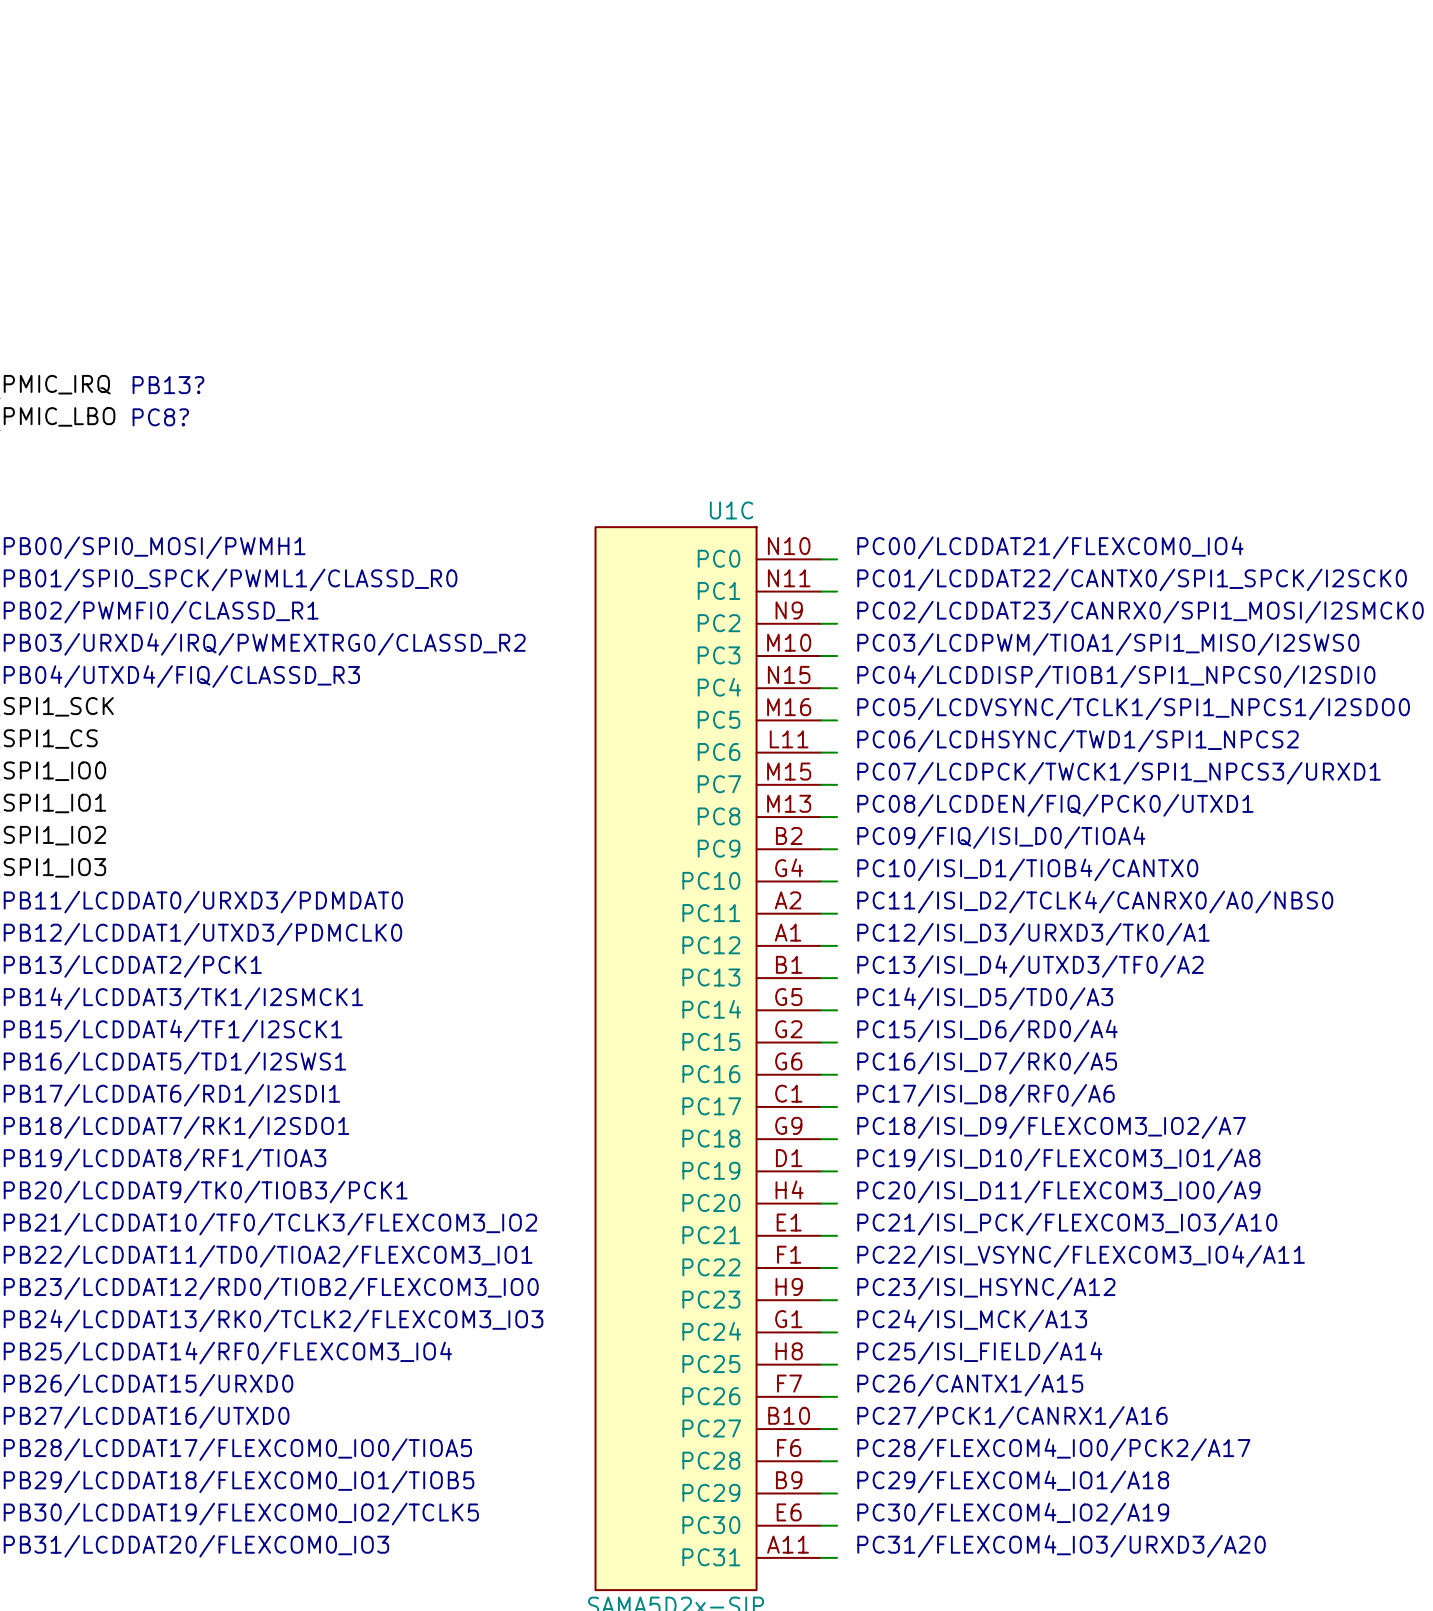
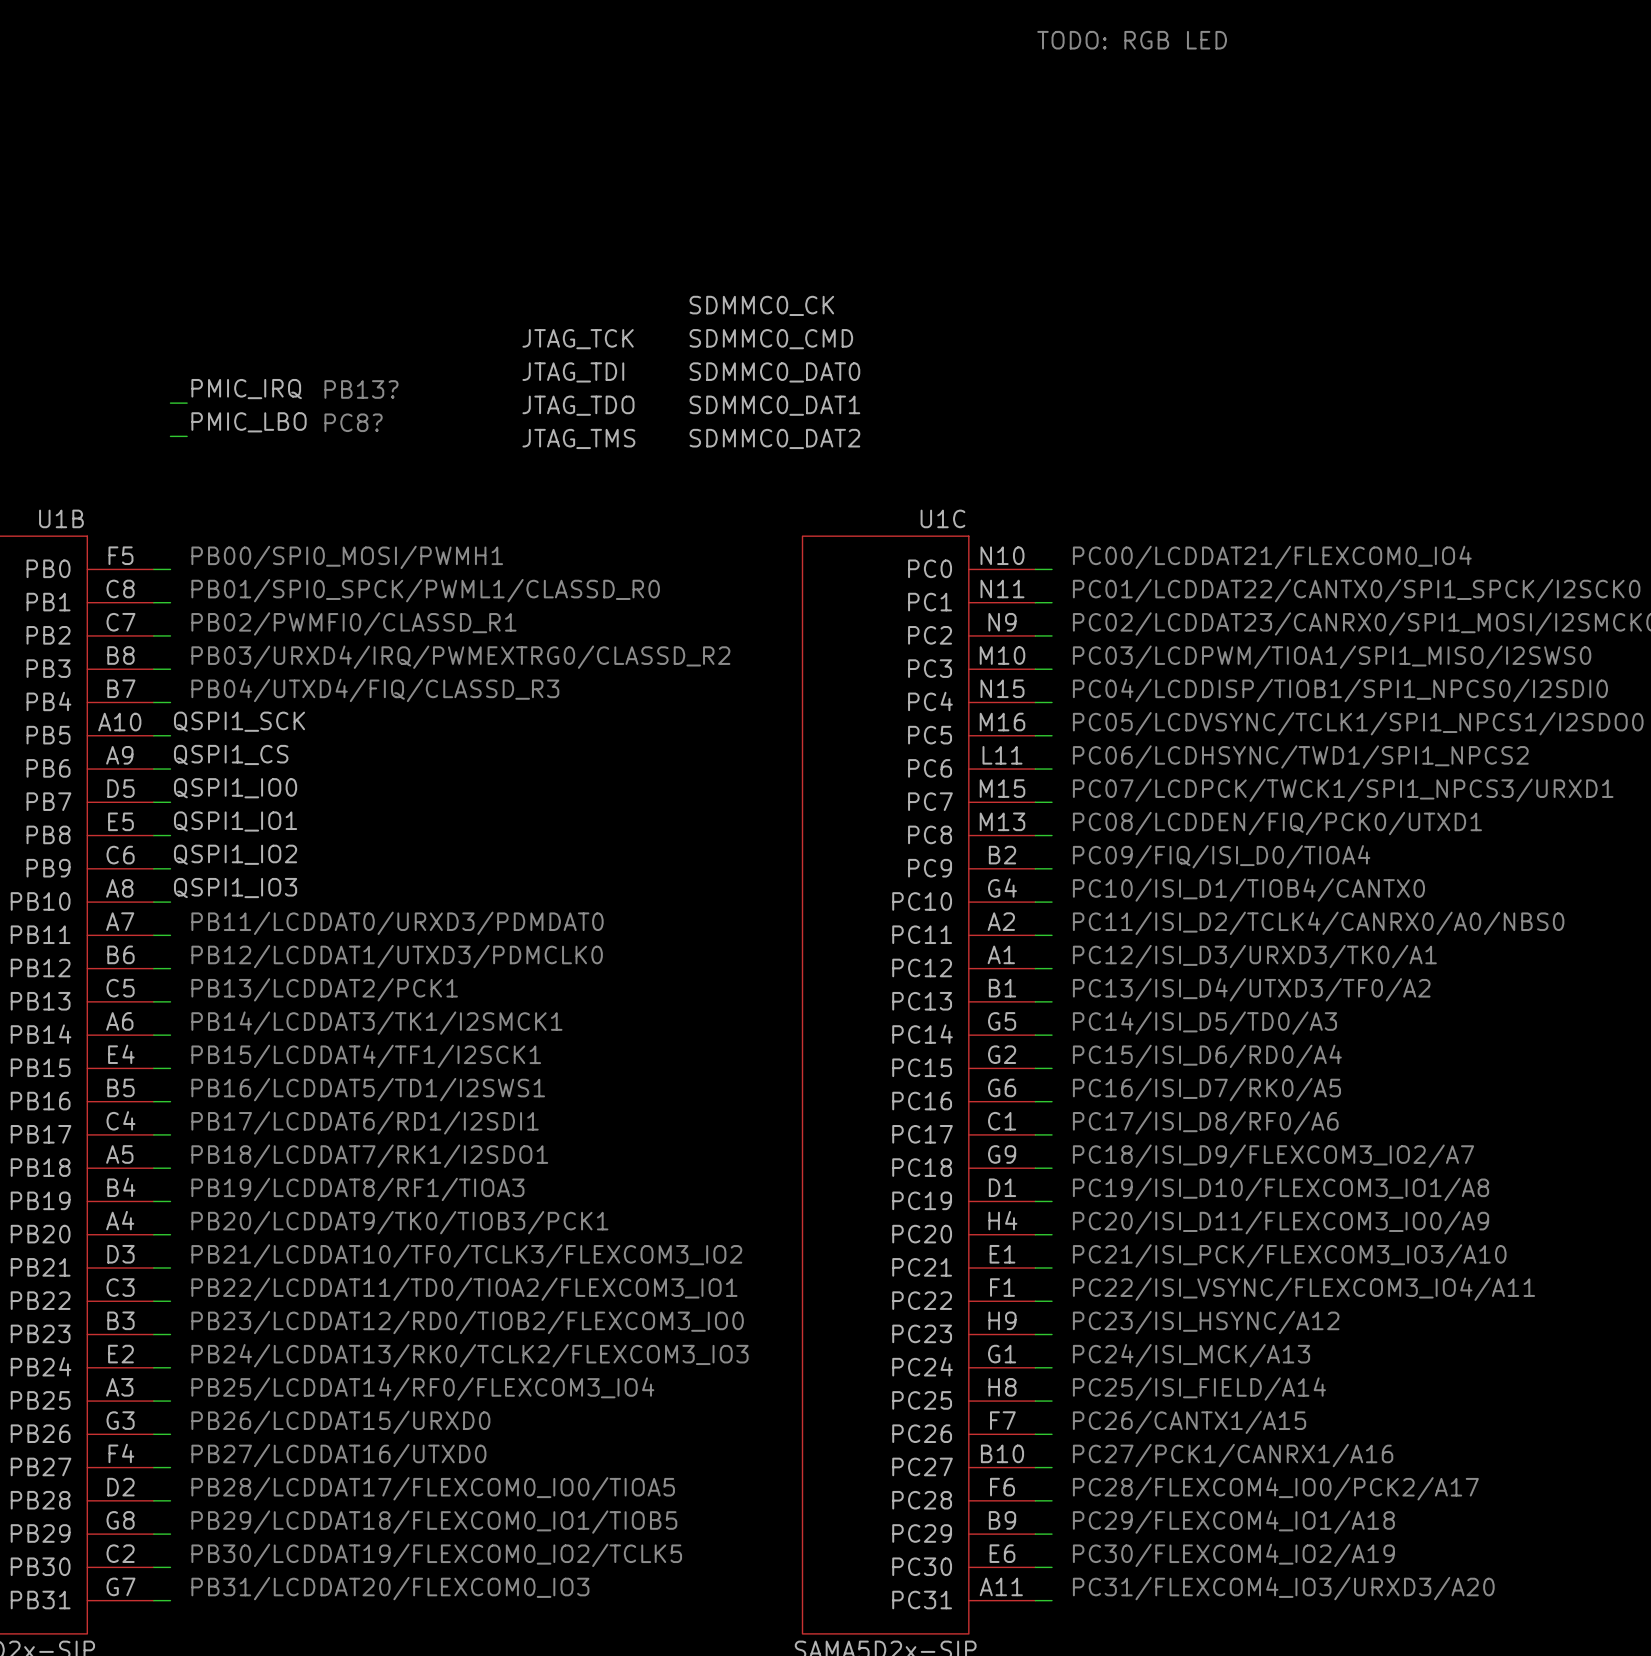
text: none -> TODO: RGB LED (1132, 40)
label: none -> SDMMC0_CK (761, 305)
label: none -> JTAG_TCK (578, 339)
label: none -> SDMMC0_CMD (771, 339)
label: none -> JTAG_TDI (573, 372)
label: none -> SDMMC0_DAT0 (774, 372)
label: none -> JTAG_TDO (578, 405)
label: none -> SDMMC0_DAT1 (774, 405)
label: none -> JTAG_TMS (578, 438)
label: none -> SDMMC0_DAT2 (774, 438)

